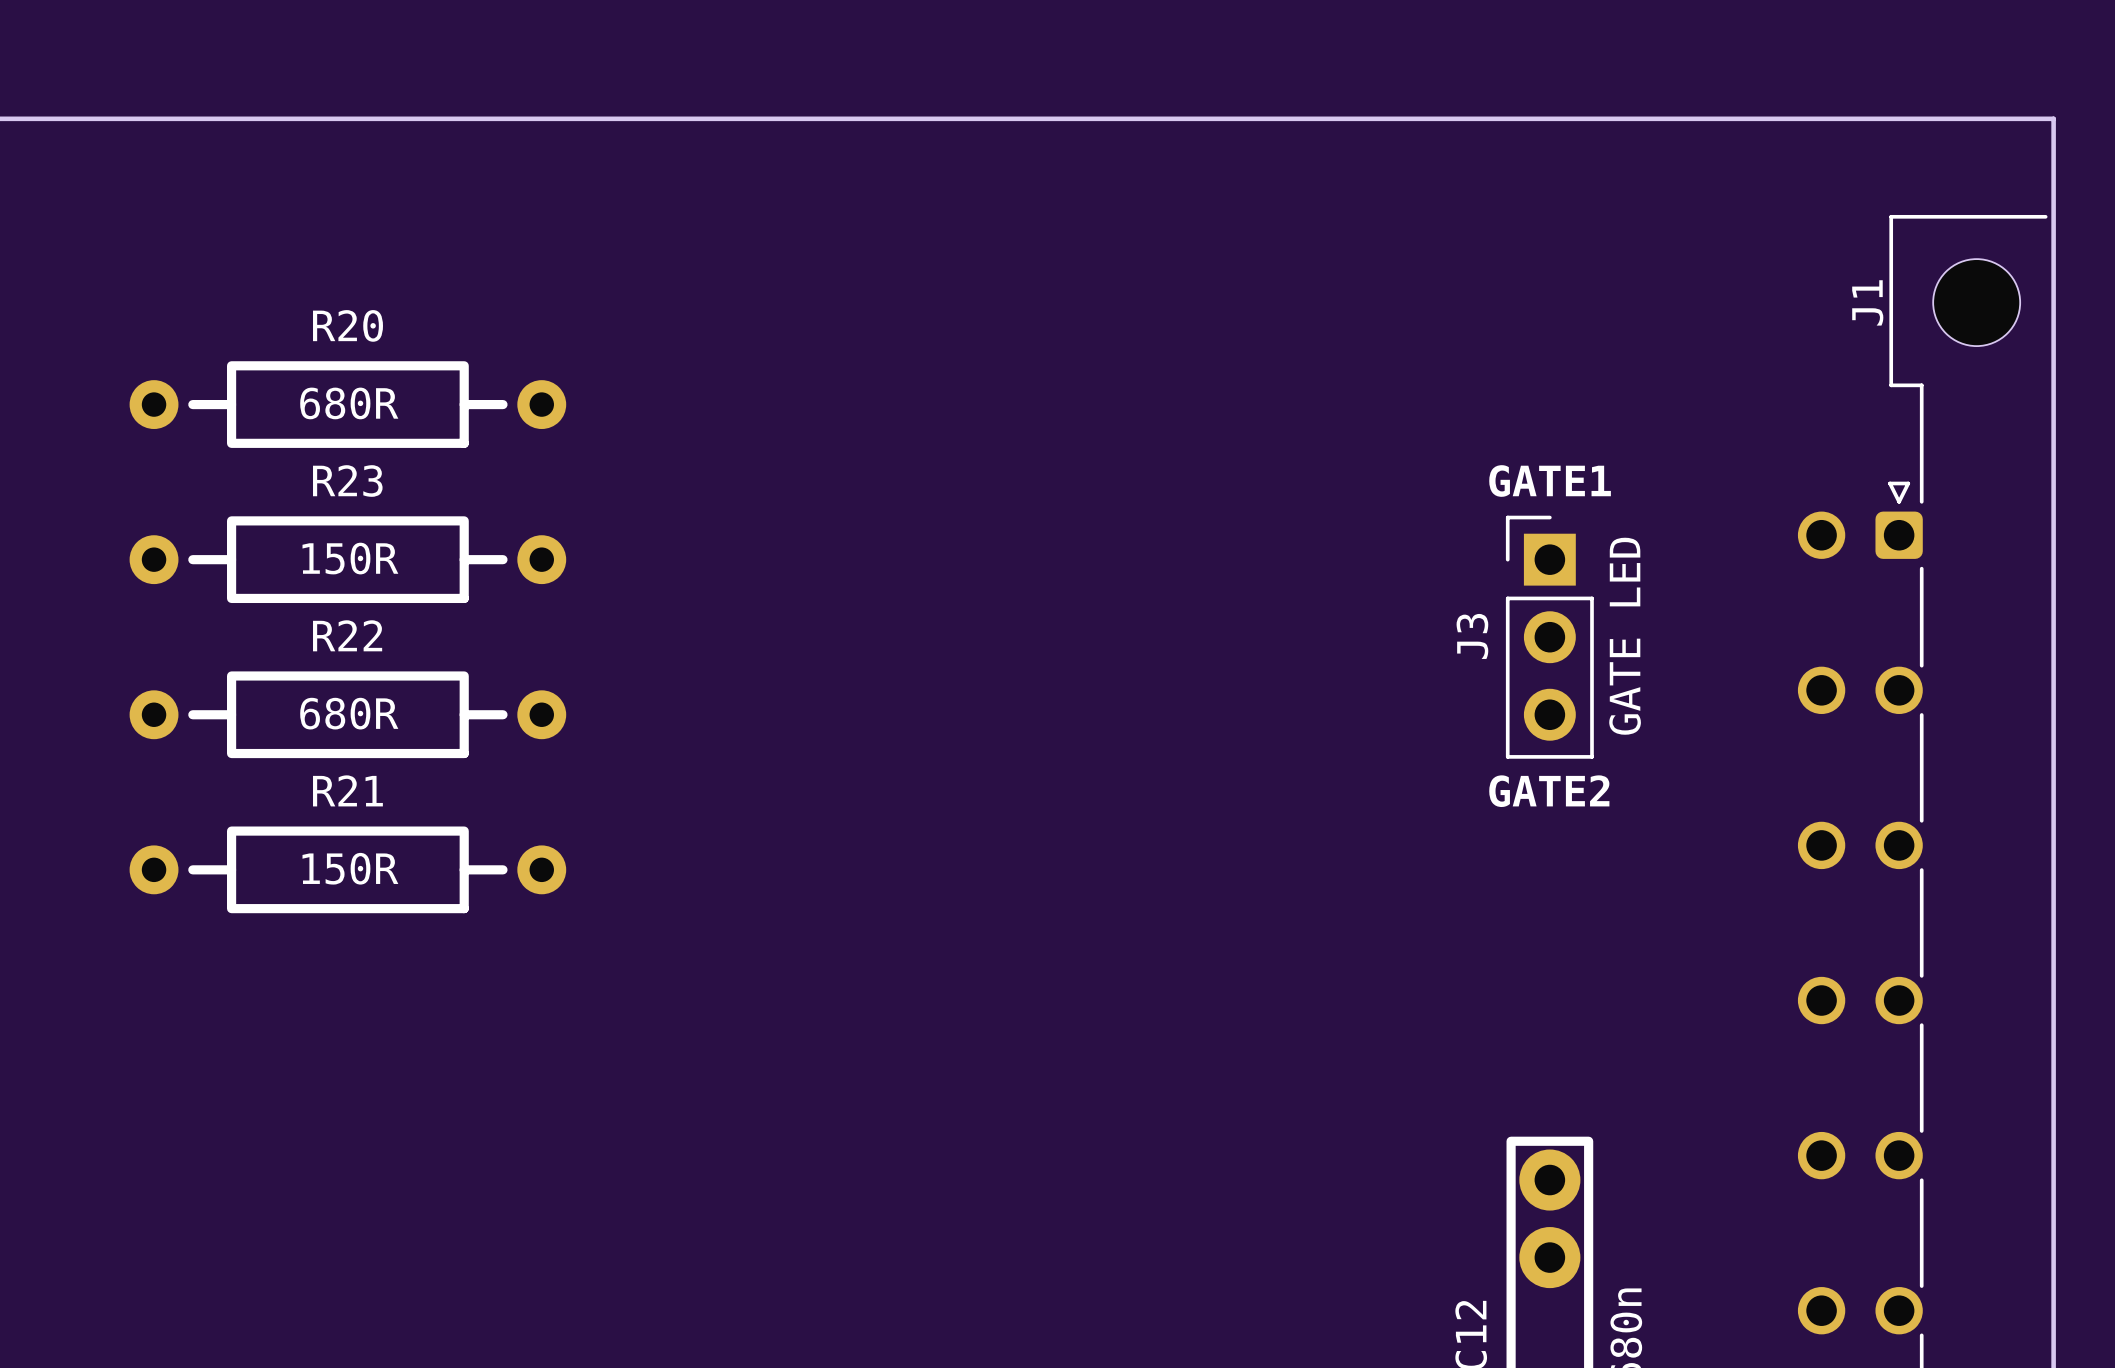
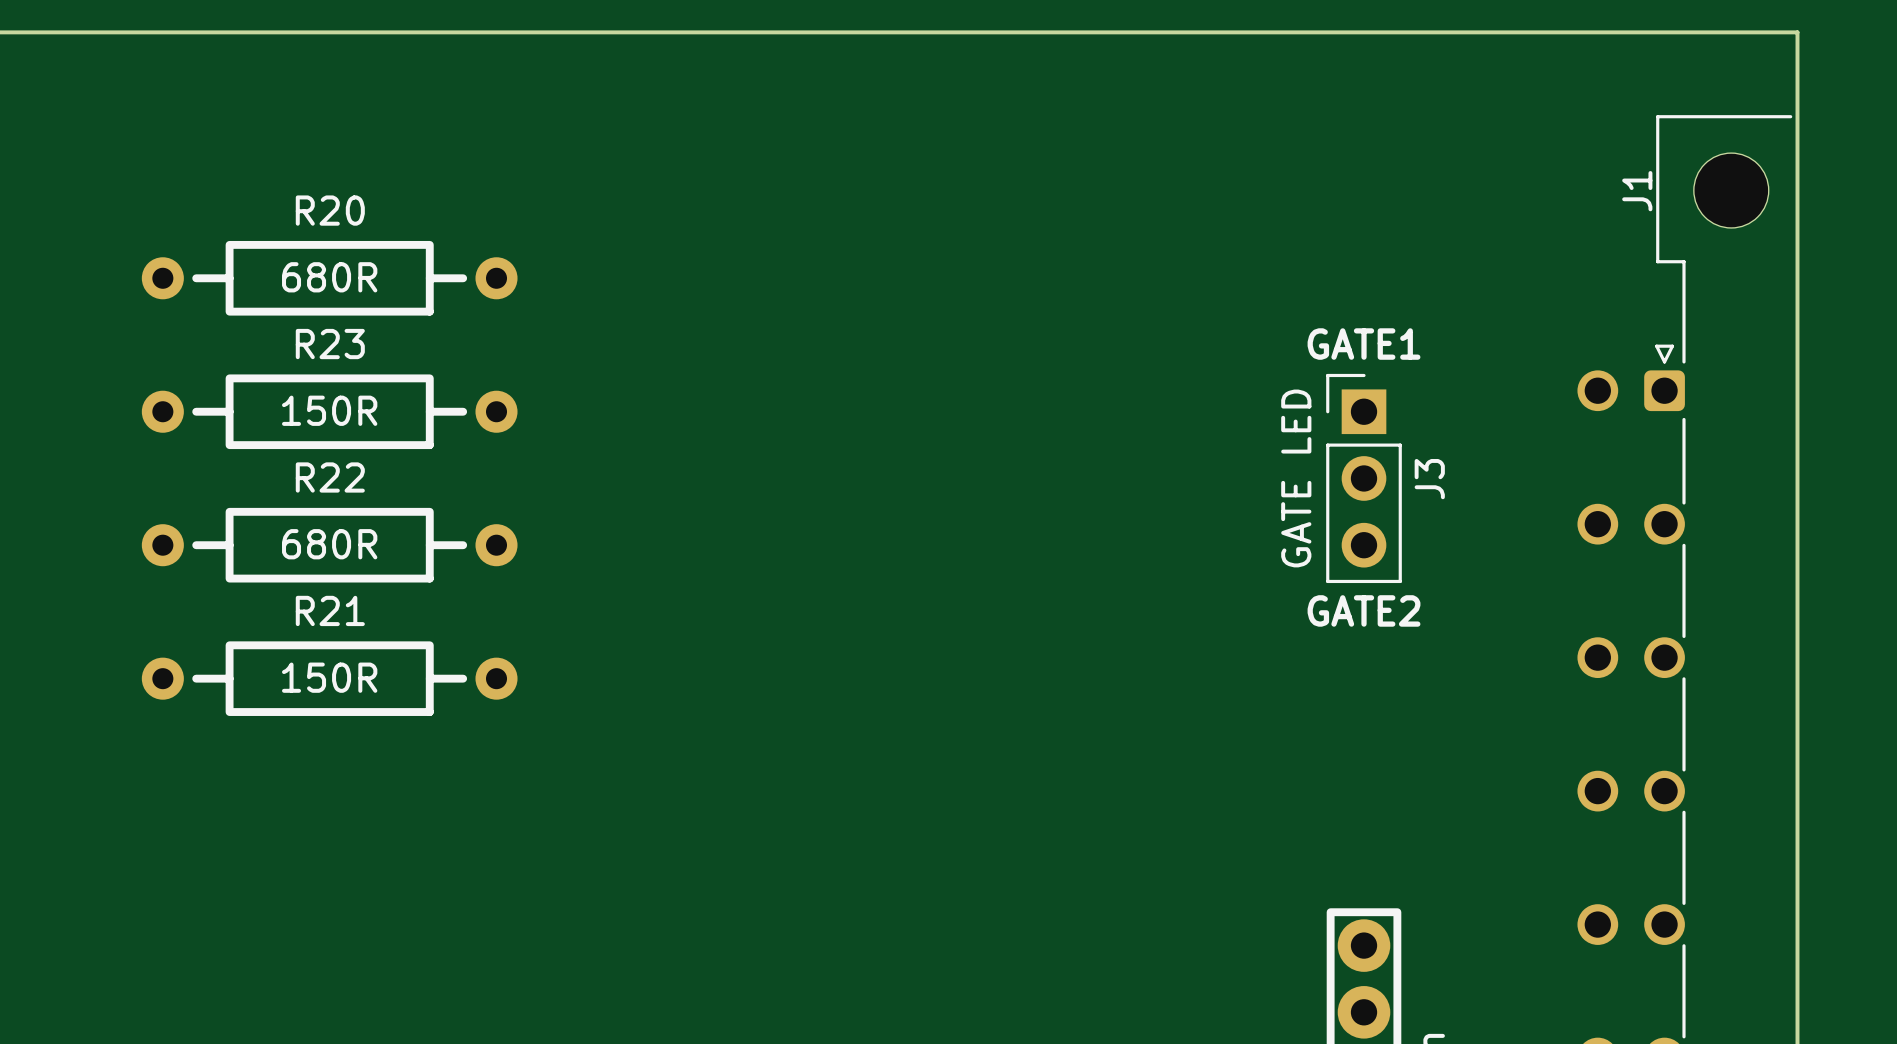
J3 name position: J3 (1472, 636) -> J3 (1429, 479)
J3 value position: GATE LED (1625, 636) -> GATE LED (1296, 478)

